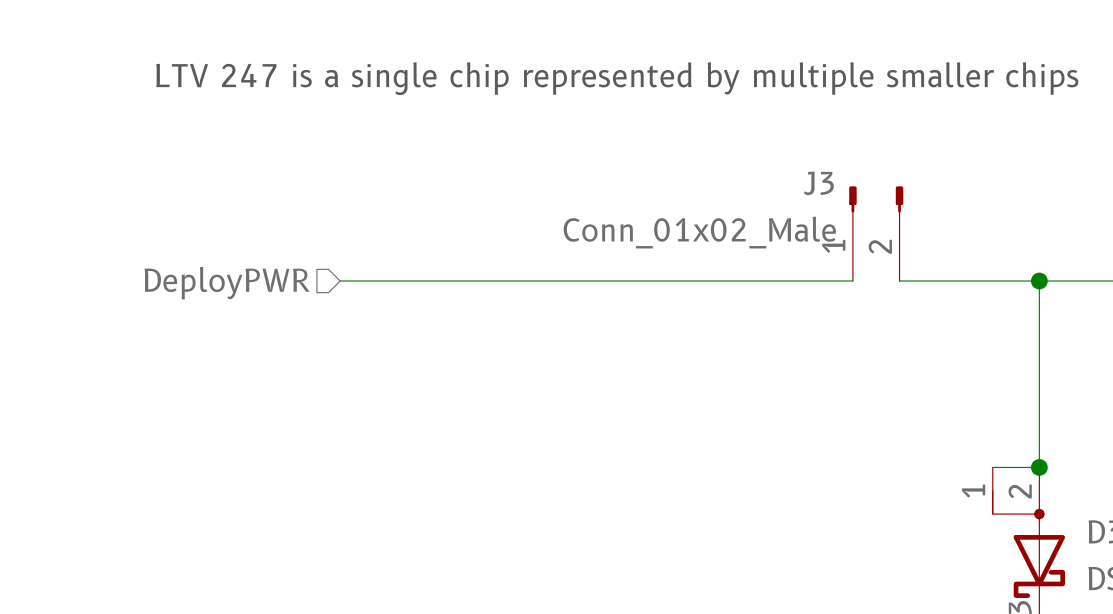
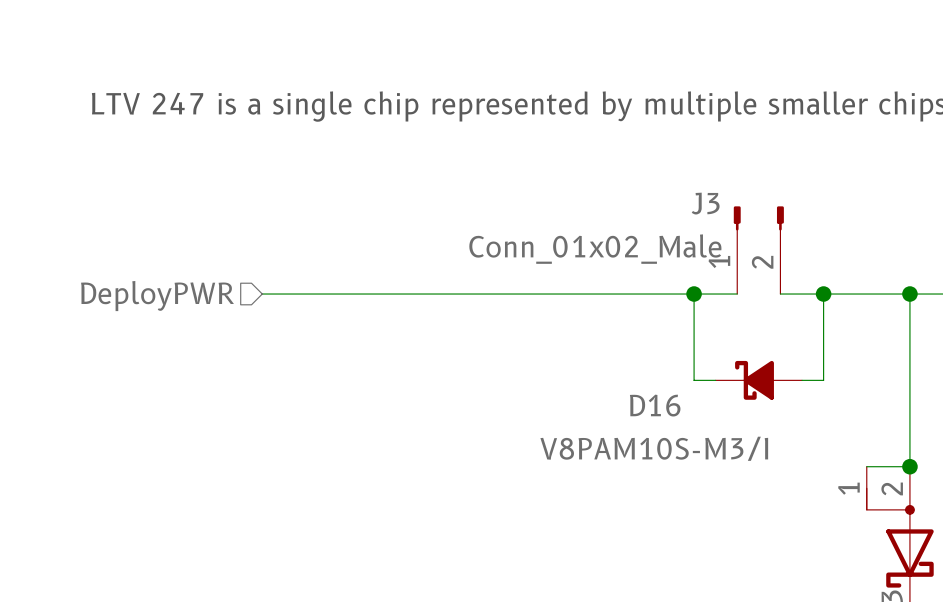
wire: none -> (694, 294) (694, 380) (715, 380)
junction: none -> (694, 294)
wire: none -> (823, 294) (823, 380) (802, 380)
junction: none -> (823, 294)
D16: none -> V8PAM10S-M3/I (758, 380)

